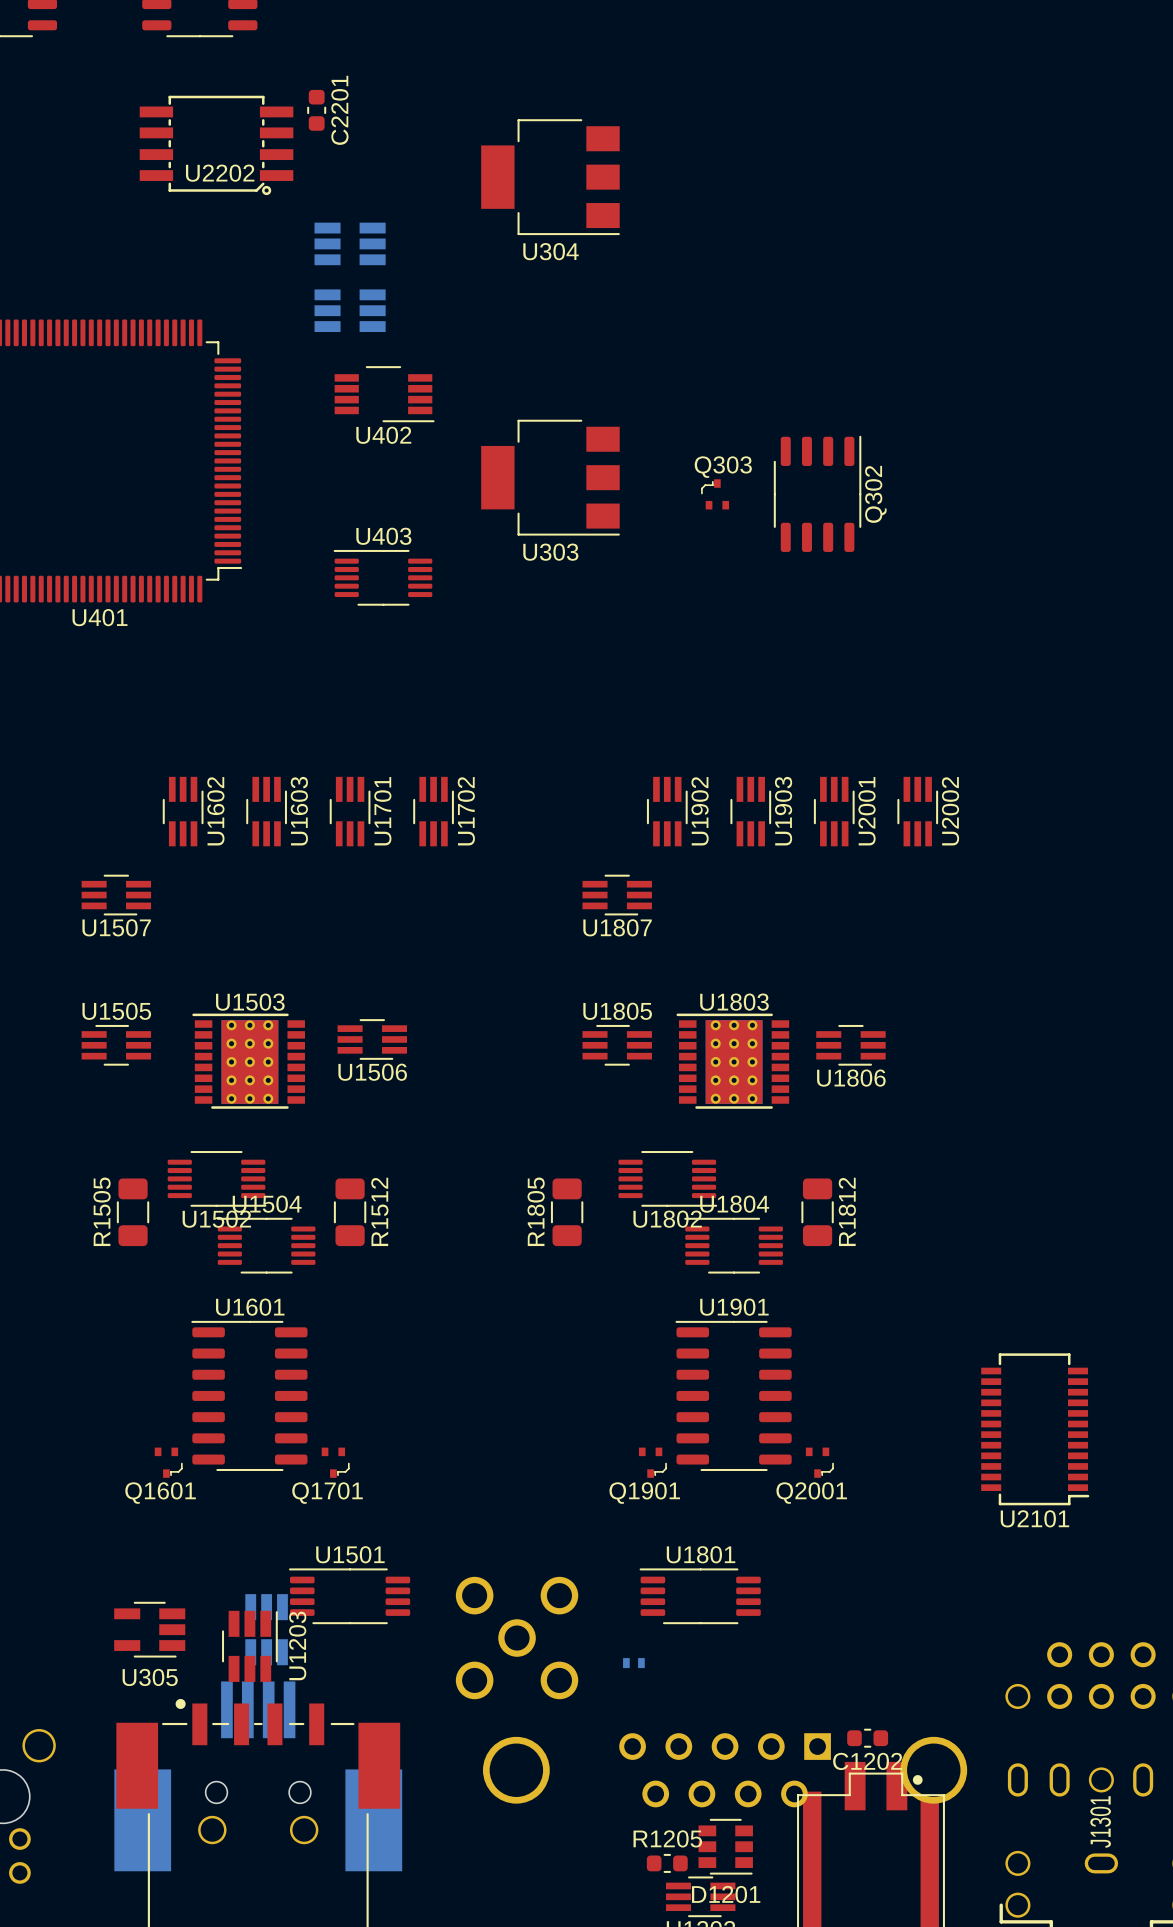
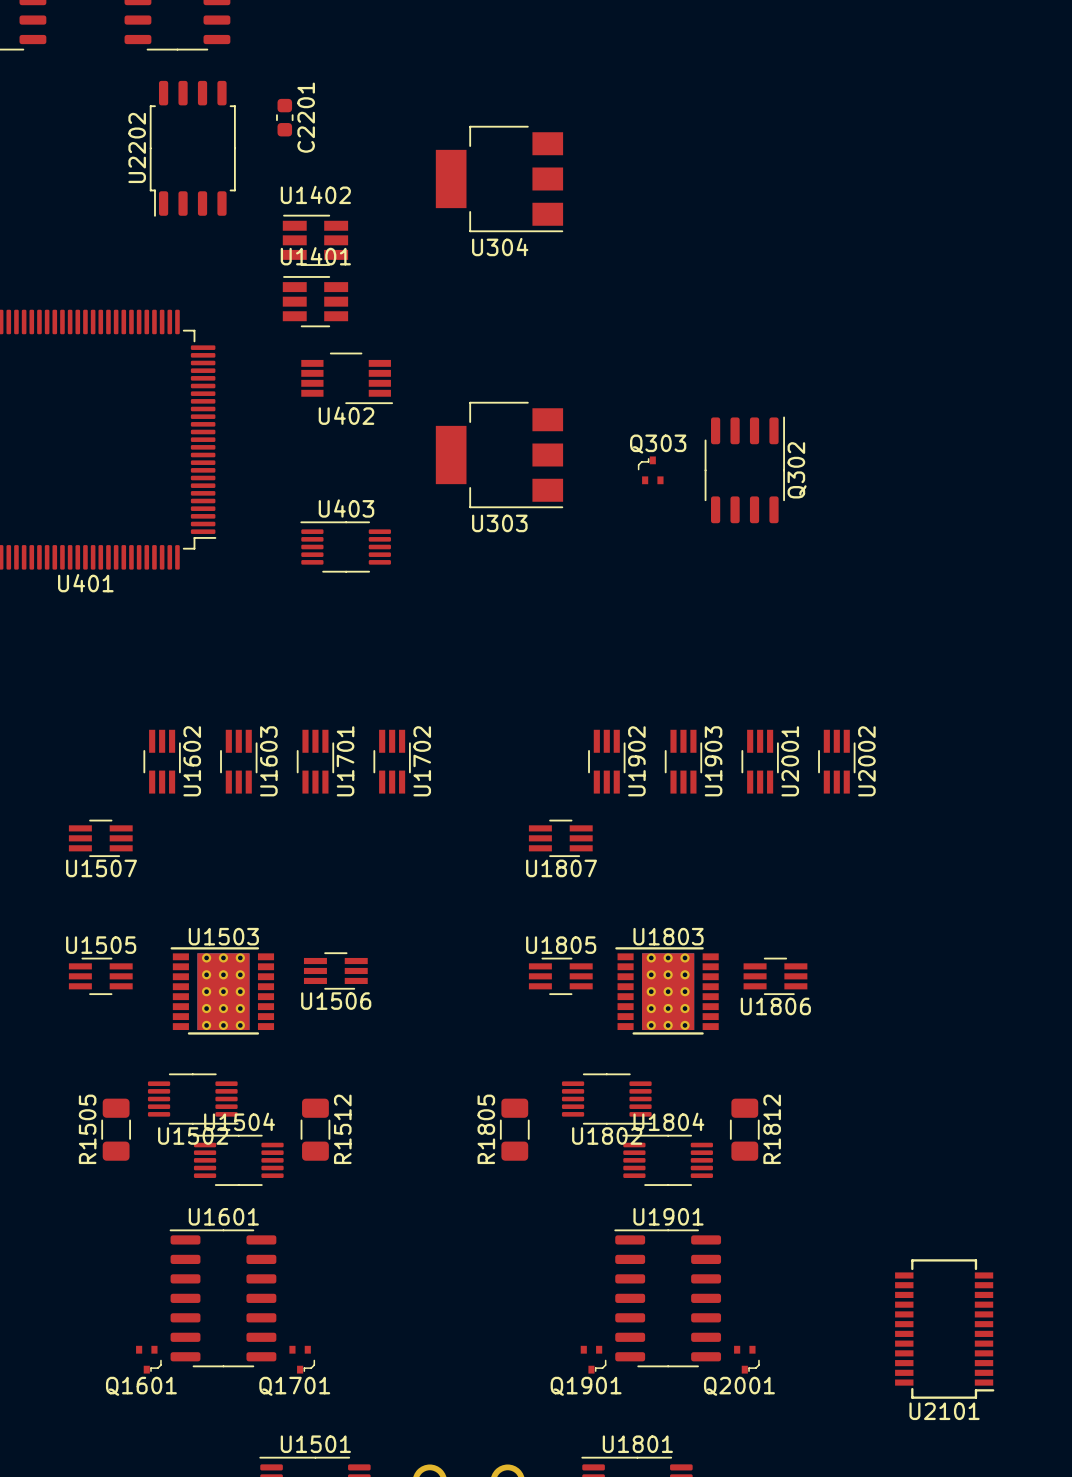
U2202 footprint: [139, 95, 294, 196] -> [149, 80, 236, 217]
U2202 name position: U2202 (220, 173) -> U2202 (137, 147)
U1402 side: bottom (350, 243) -> top (315, 240)
U1401 side: bottom (350, 310) -> top (315, 301)

